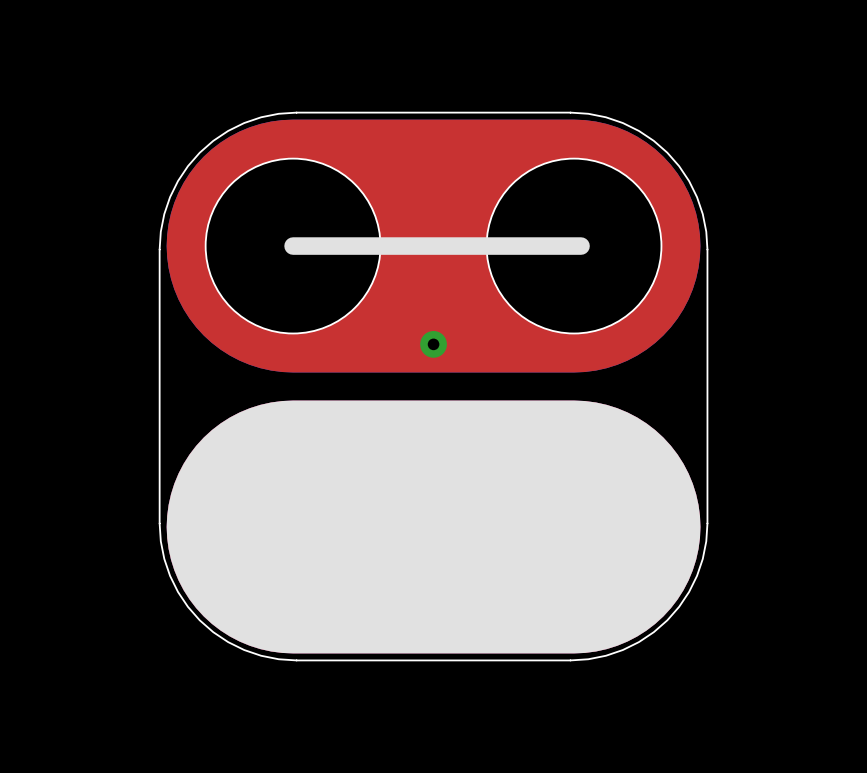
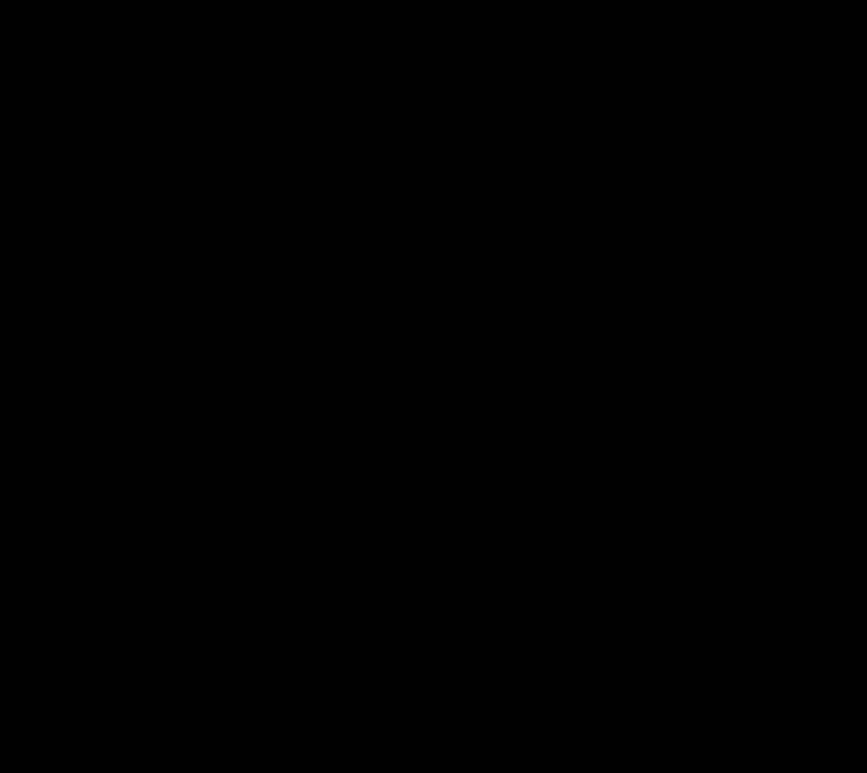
part: (433, 386) -> none

